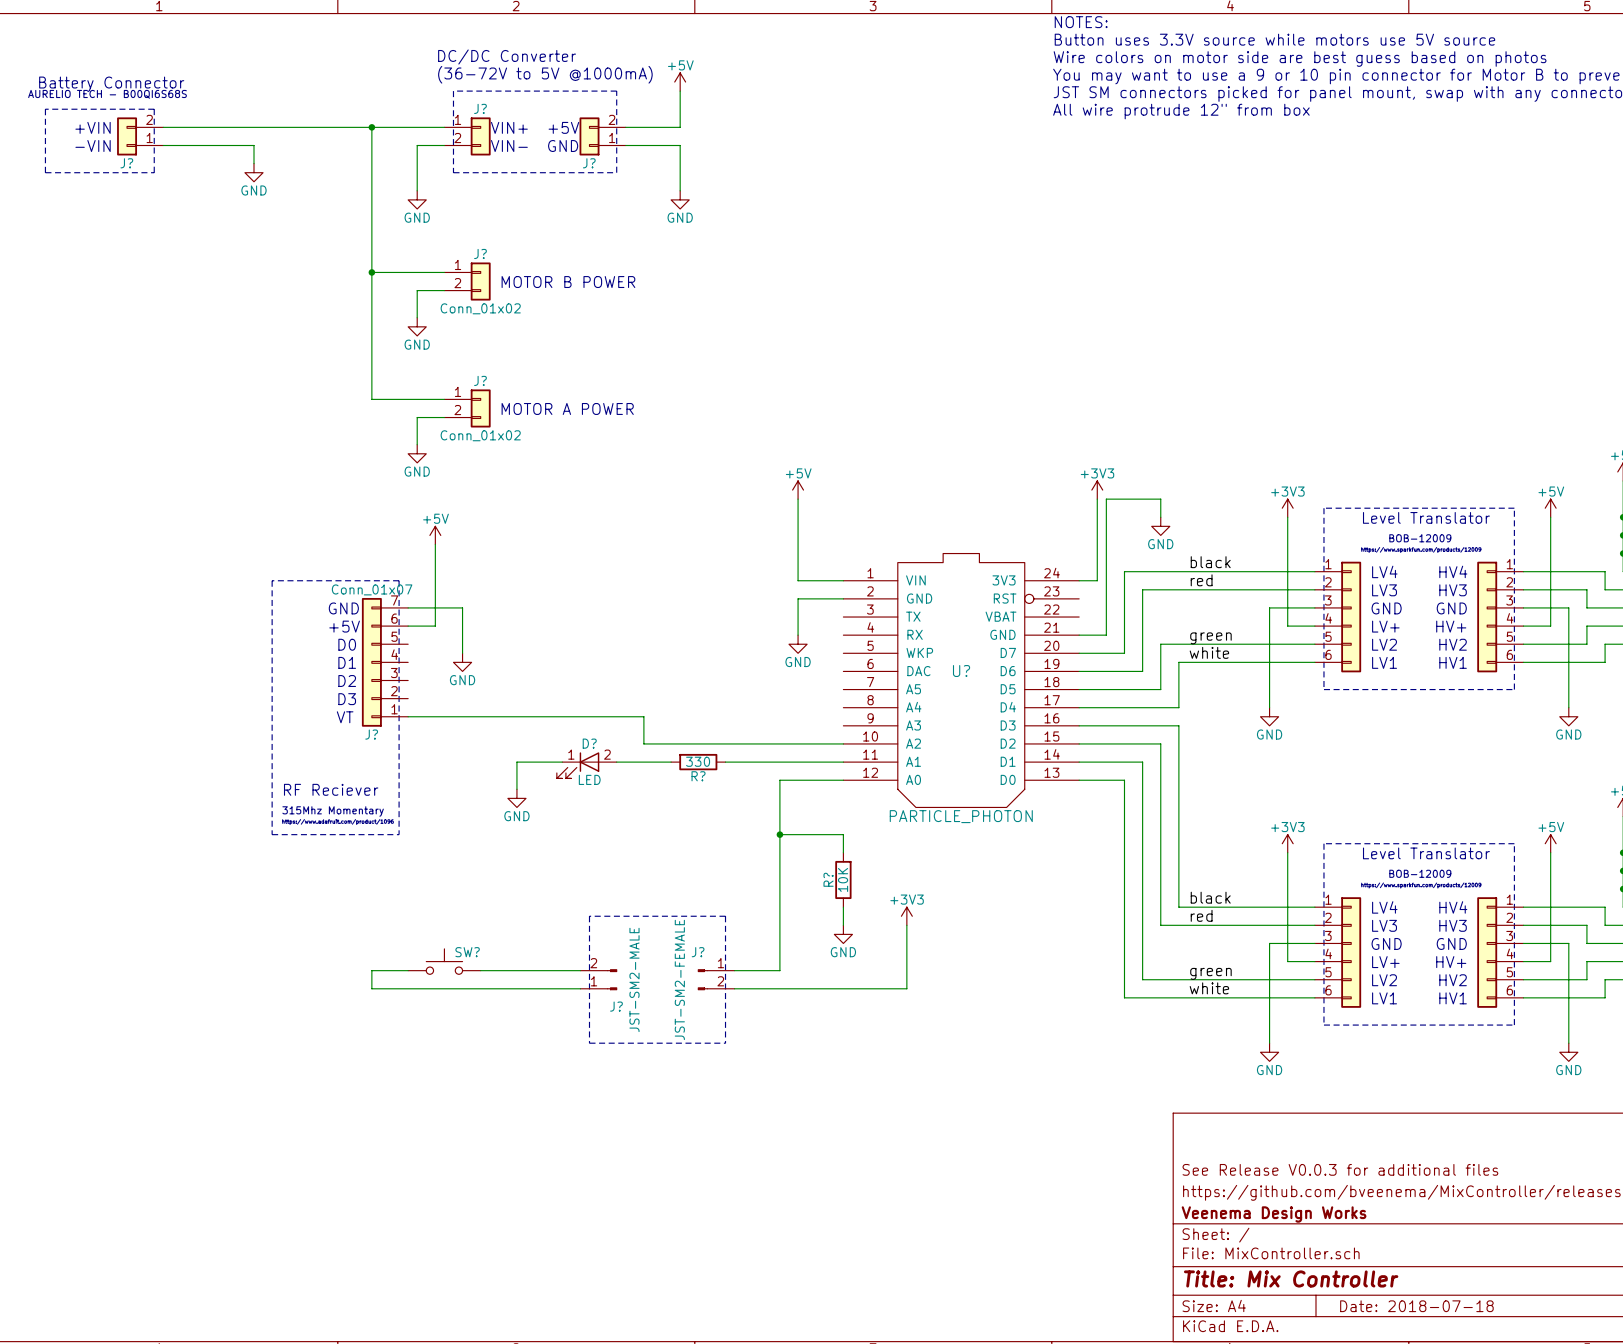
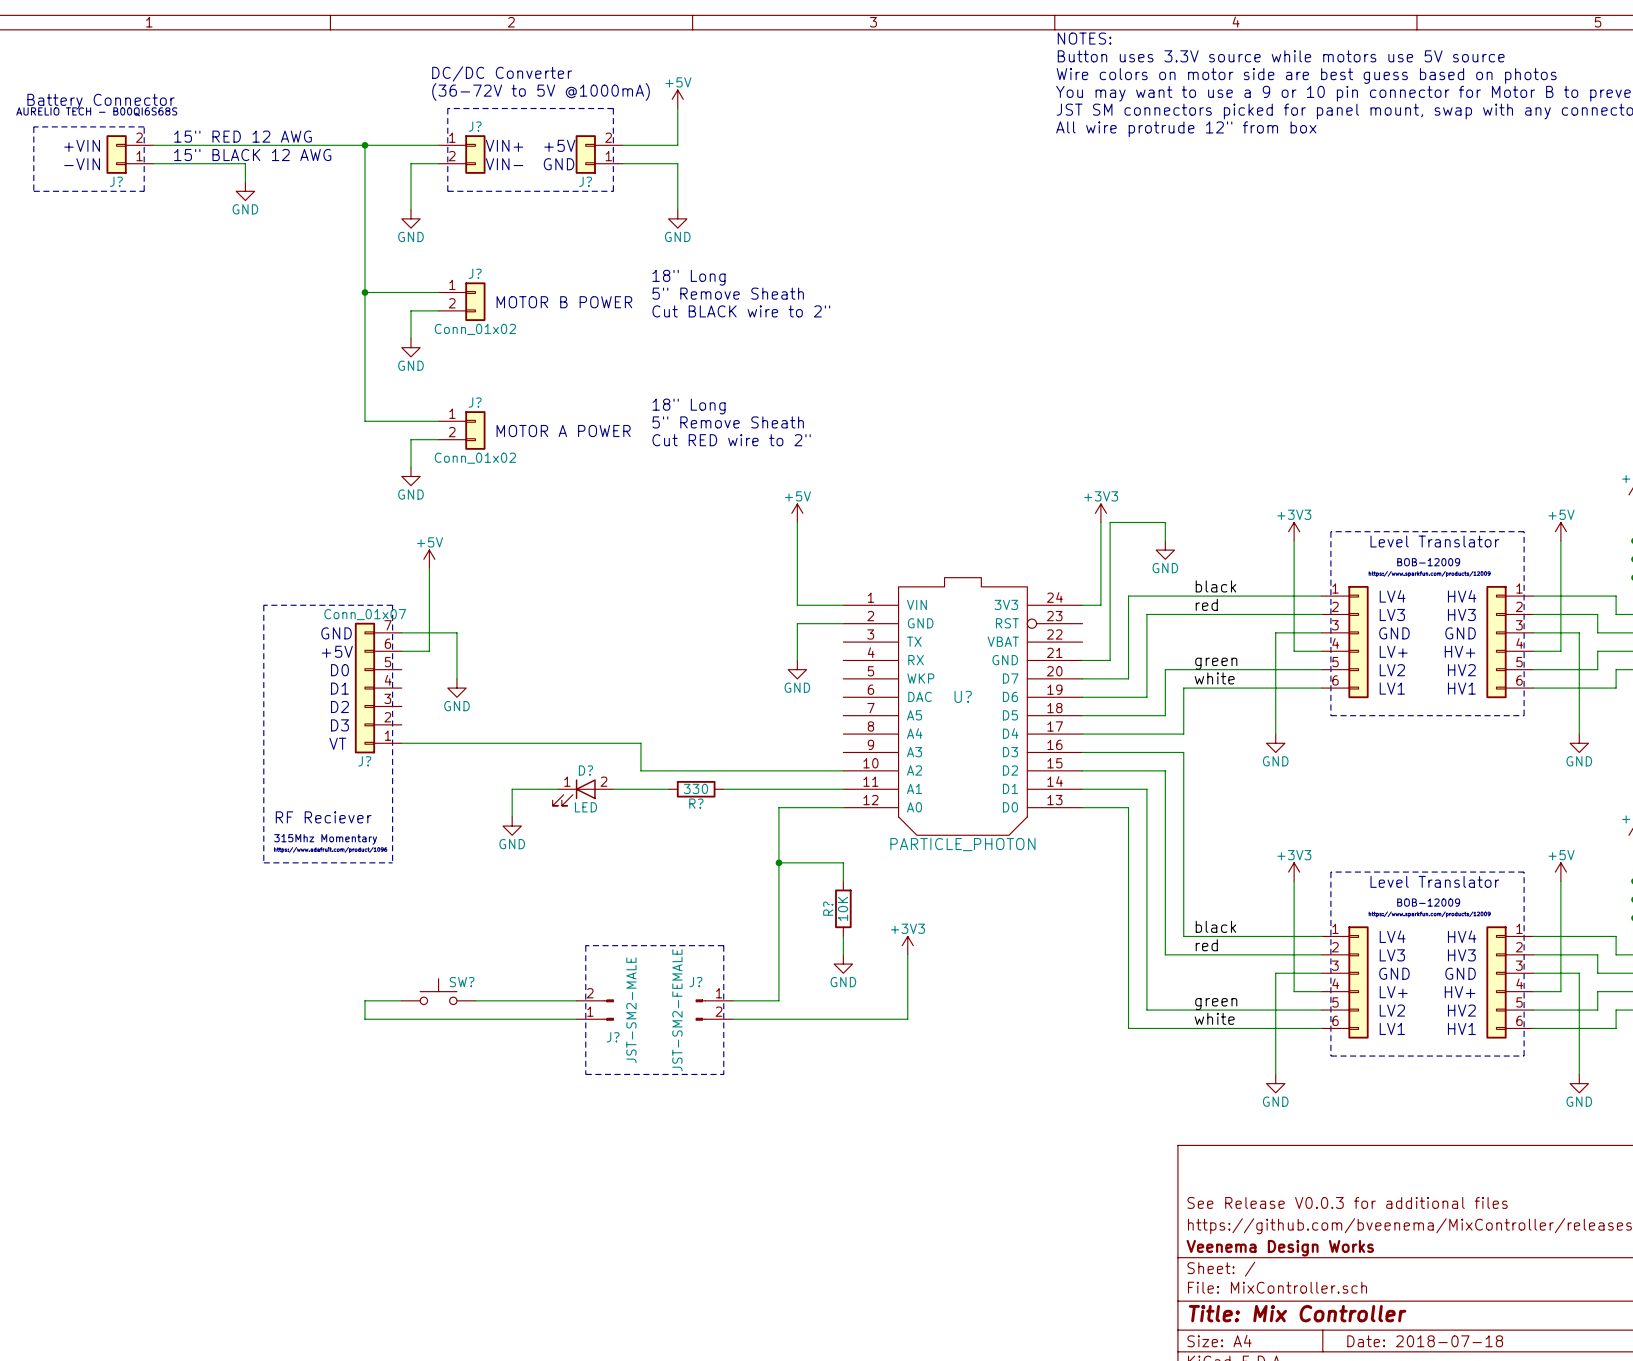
text: none -> 15" RED 12 AWG (242, 136)
text: none -> 15" BLACK 12 AWG (252, 155)
text: none -> 18" Long (689, 277)
text: none -> 5" Remove Sheath (728, 293)
text: none -> Cut BLACK wire to 2" (741, 311)
text: none -> 18" Long (689, 406)
text: none -> 5" Remove Sheath (728, 422)
text: none -> Cut RED wire to 2" (731, 440)

